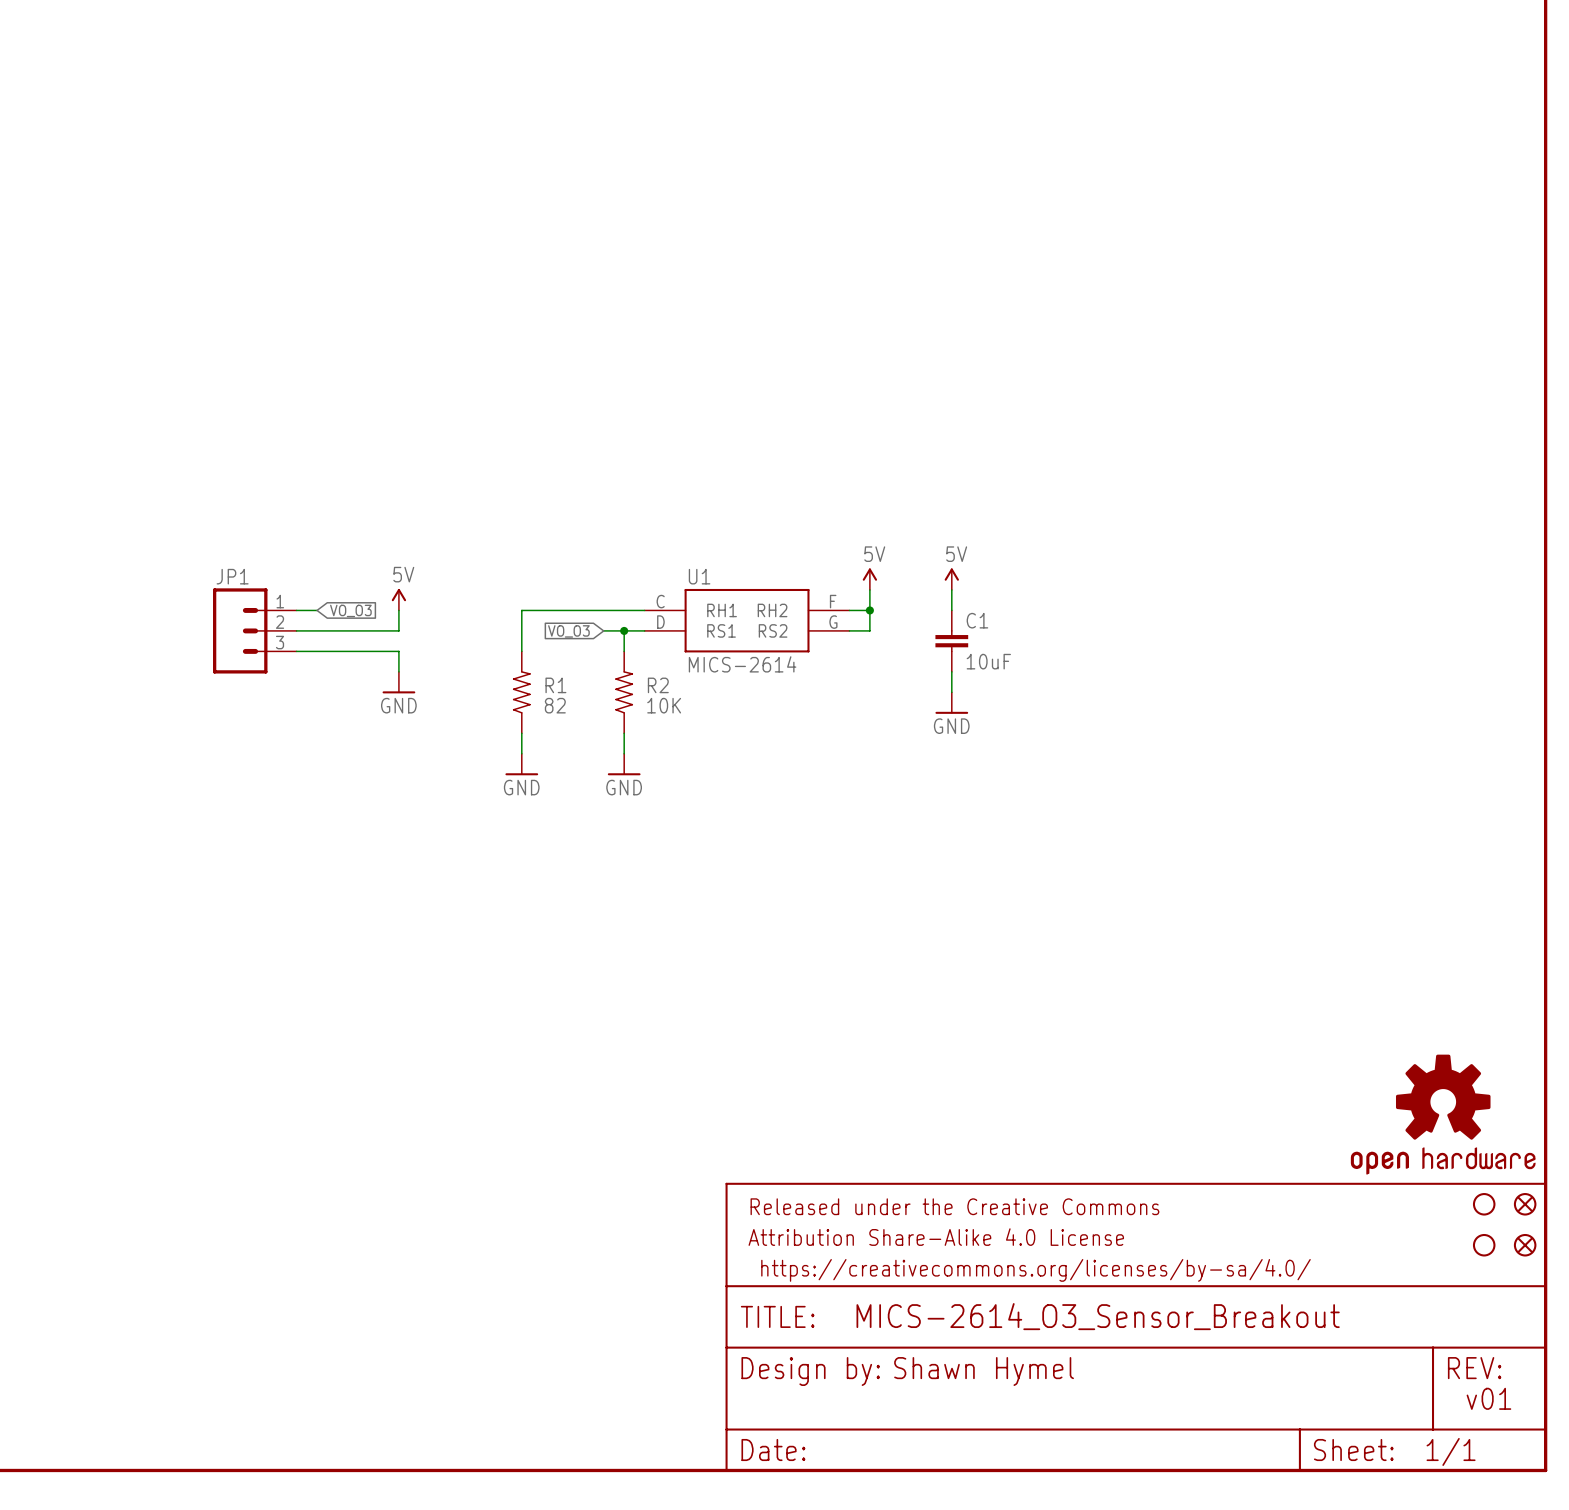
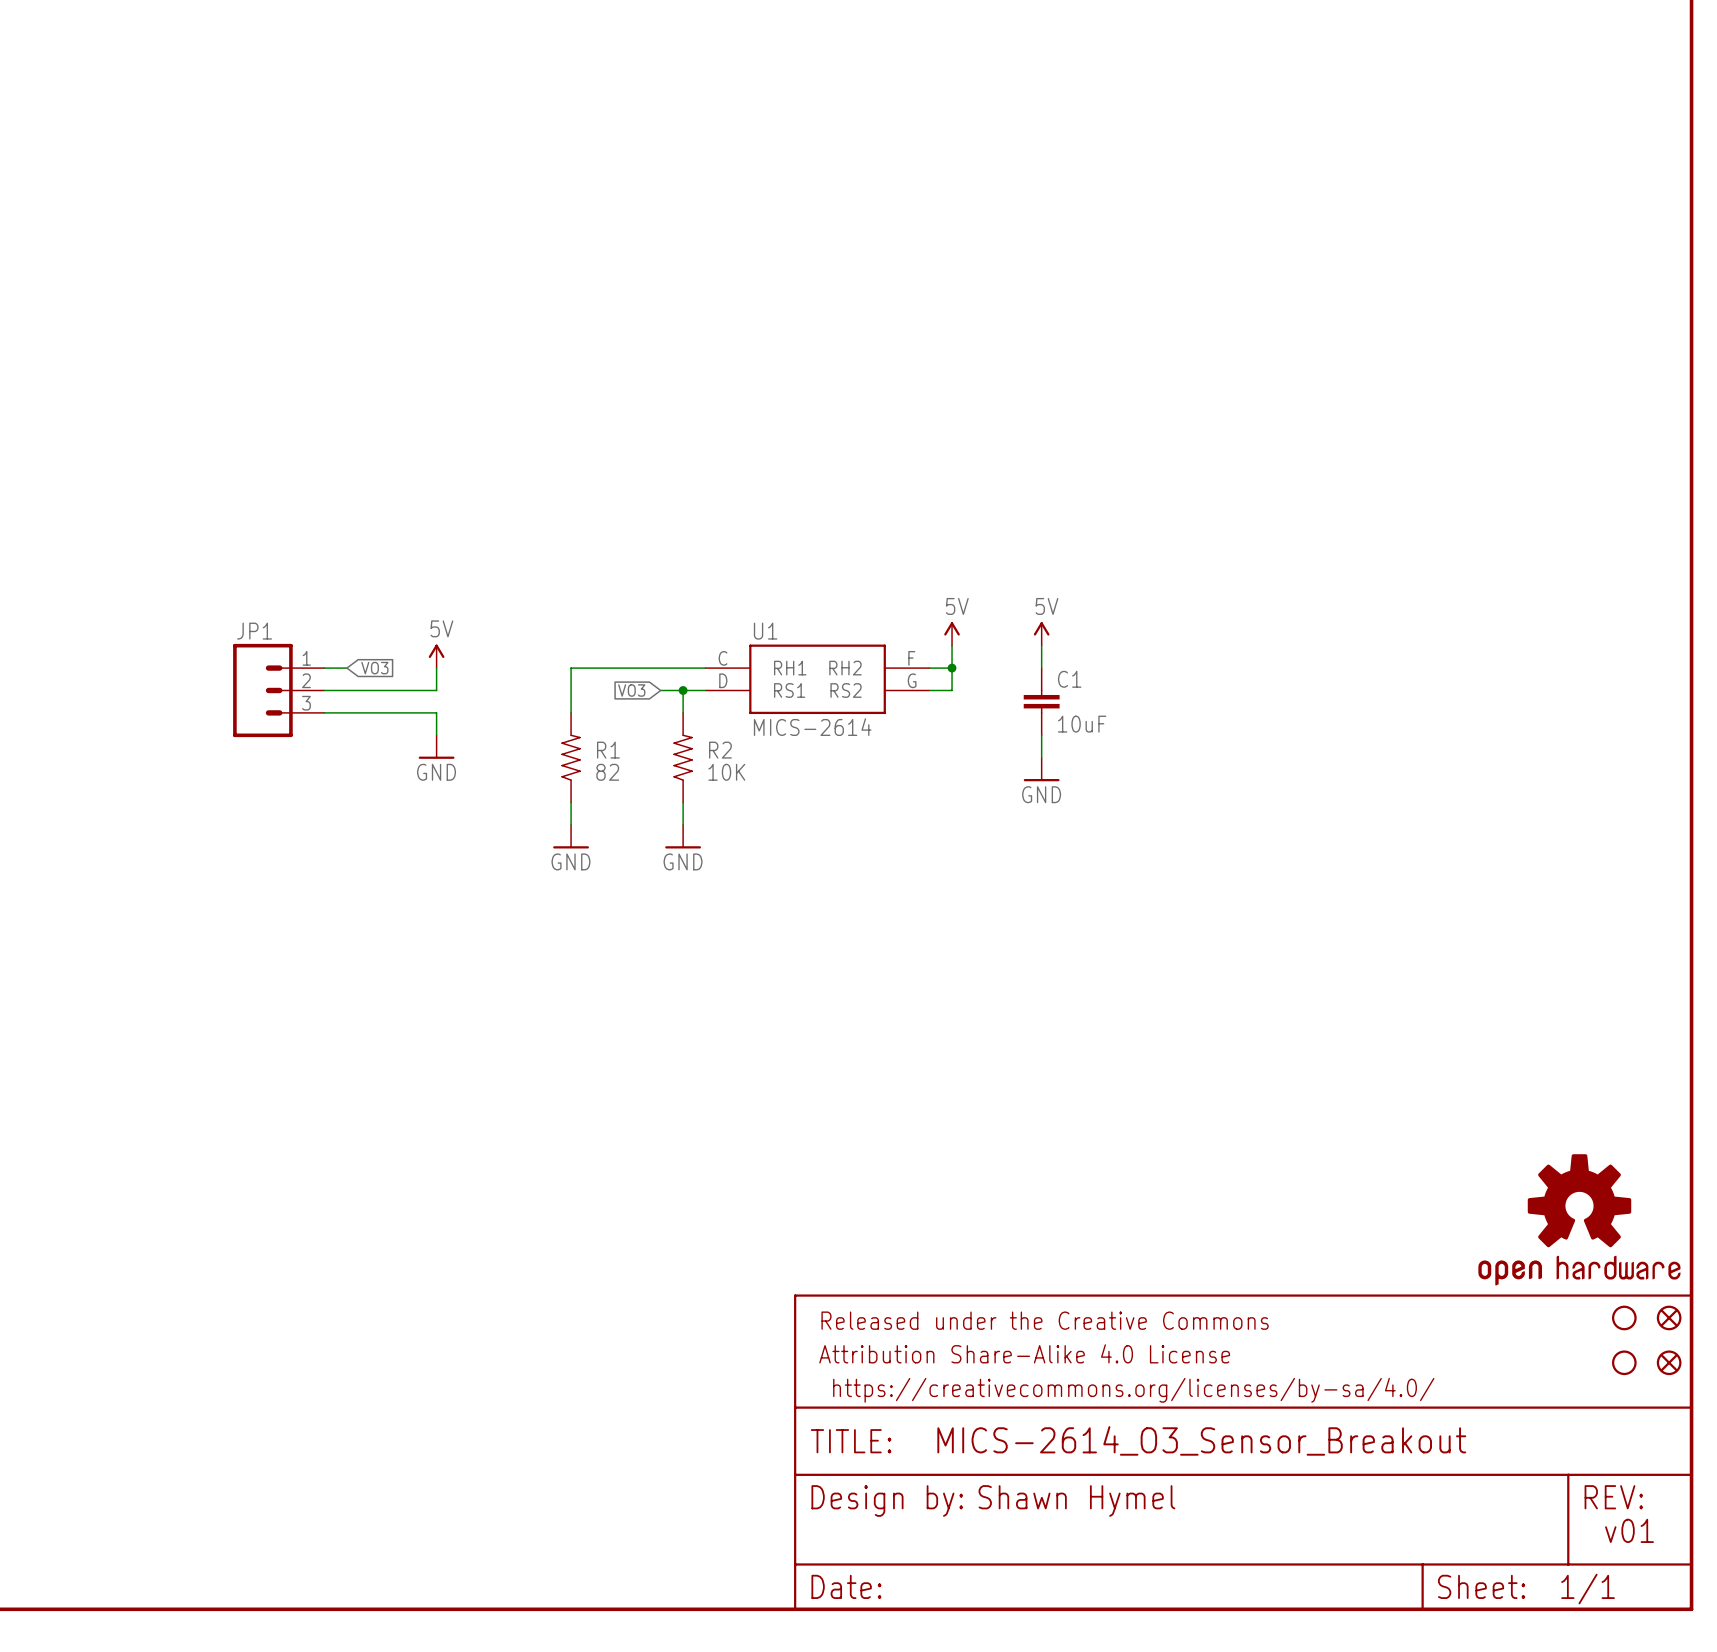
global label: VO_O3 (350, 610) -> VO3 (374, 668)
global label: VO_O3 (568, 631) -> VO3 (631, 690)

